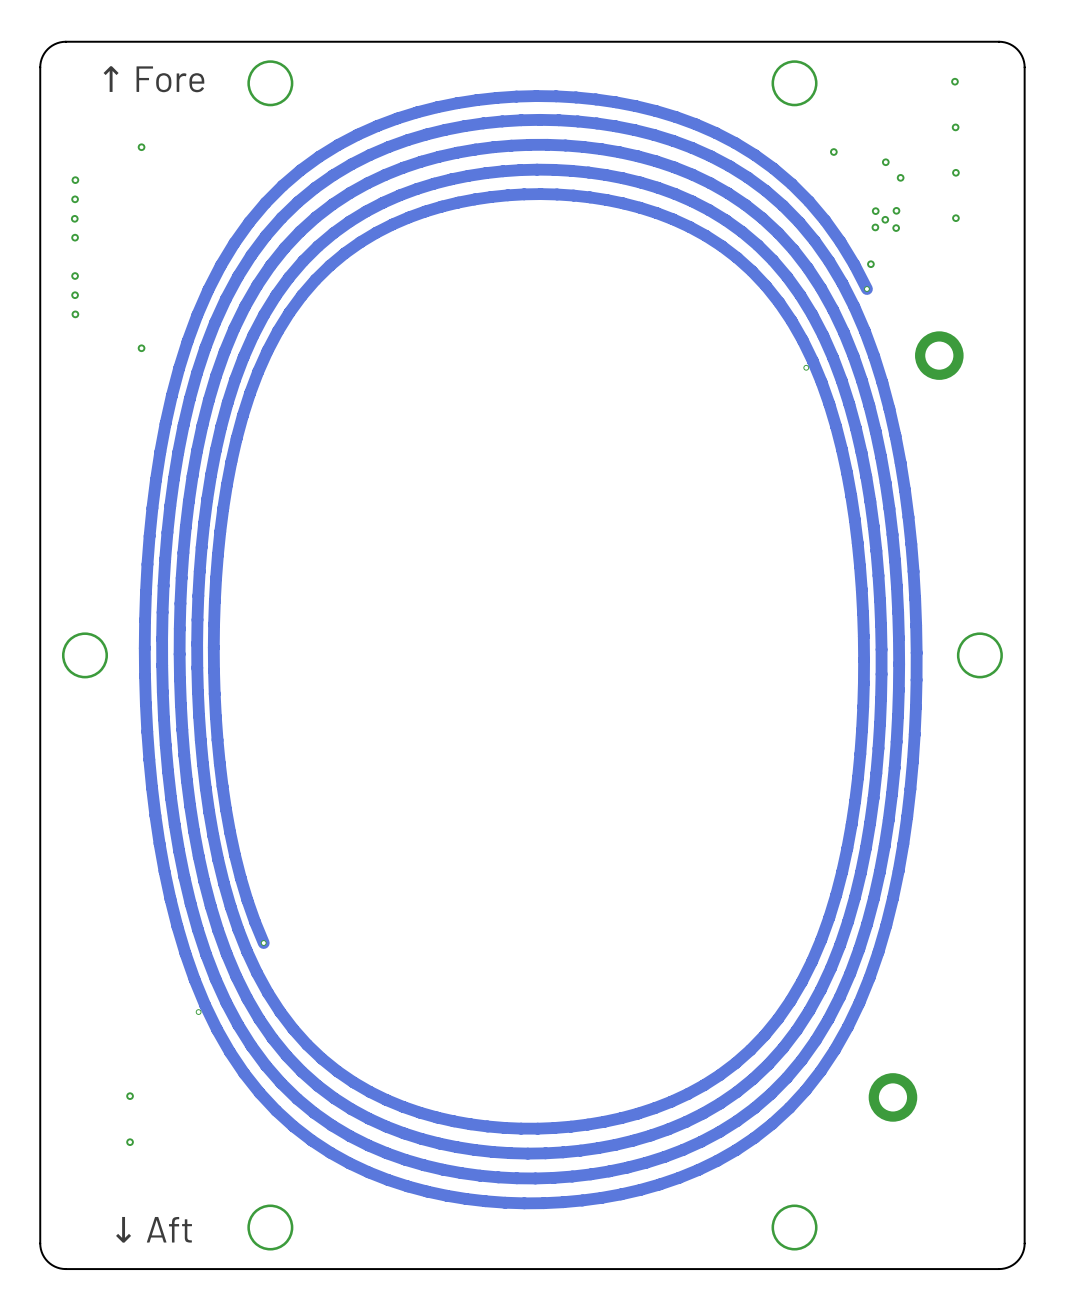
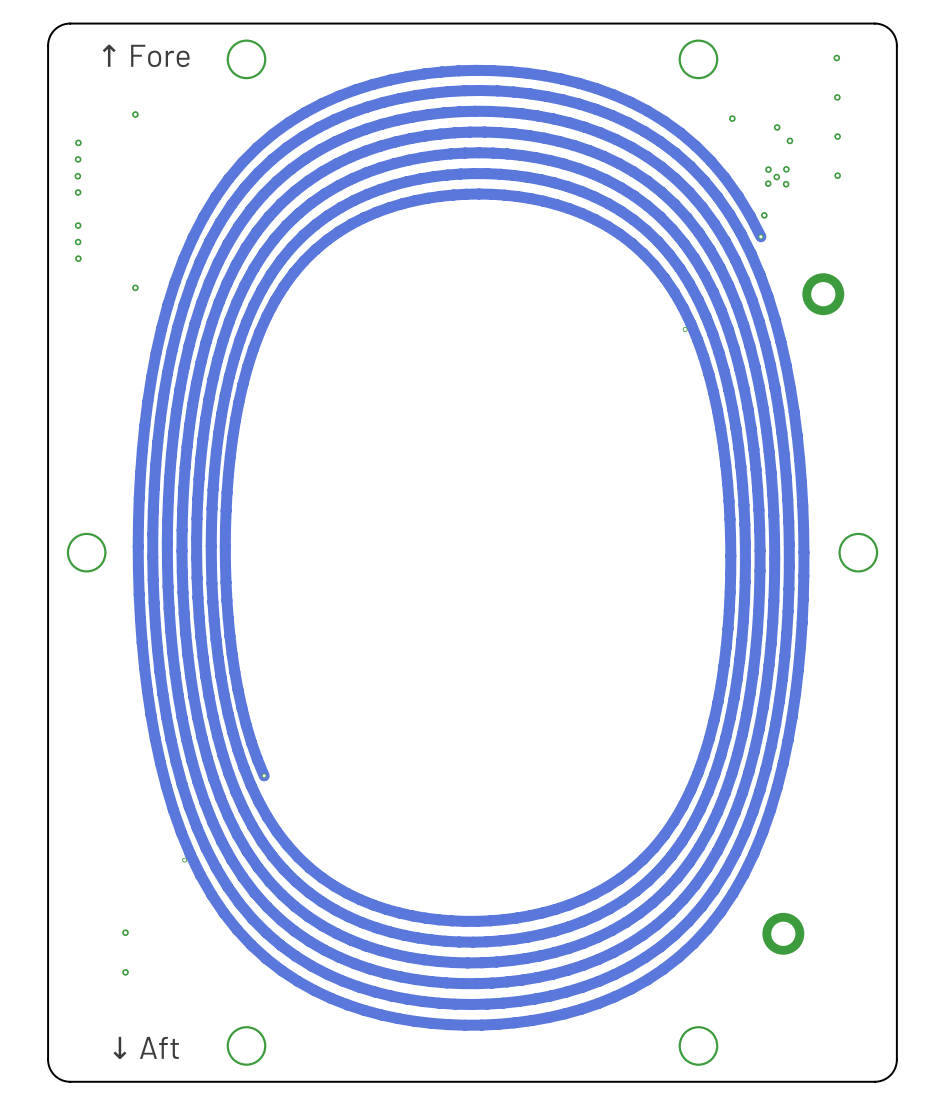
part footprint: [138, 90, 923, 1210] -> [132, 64, 810, 1031]

